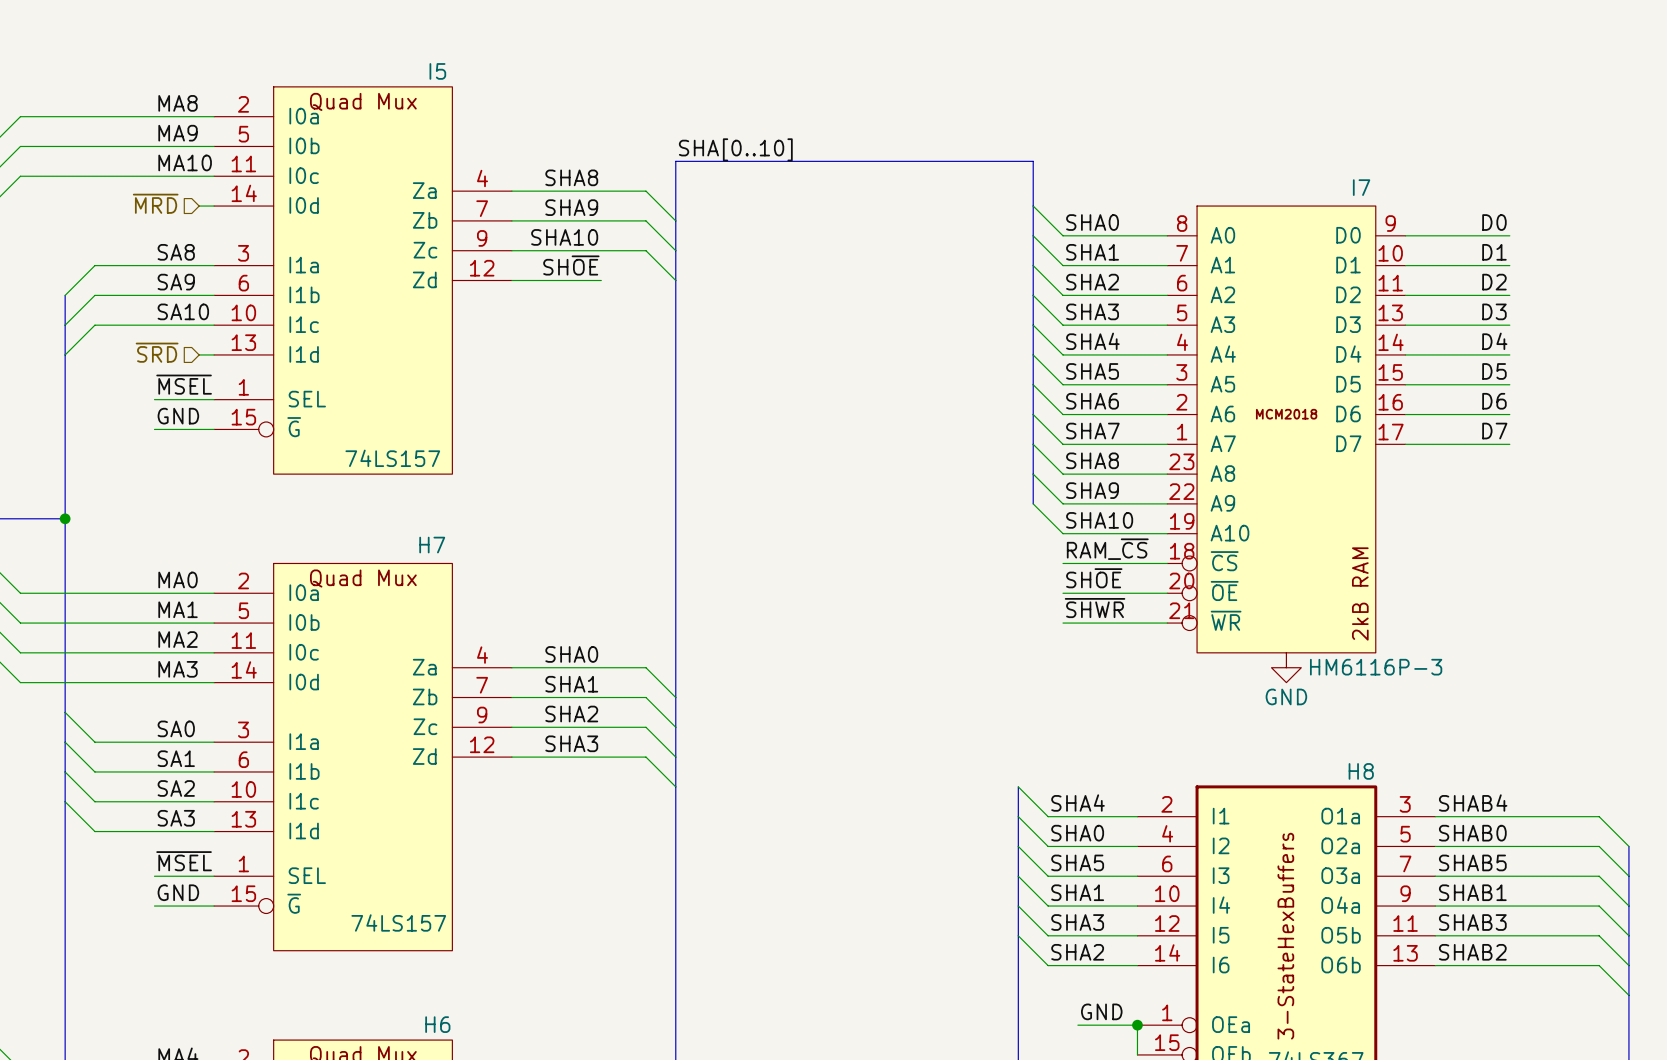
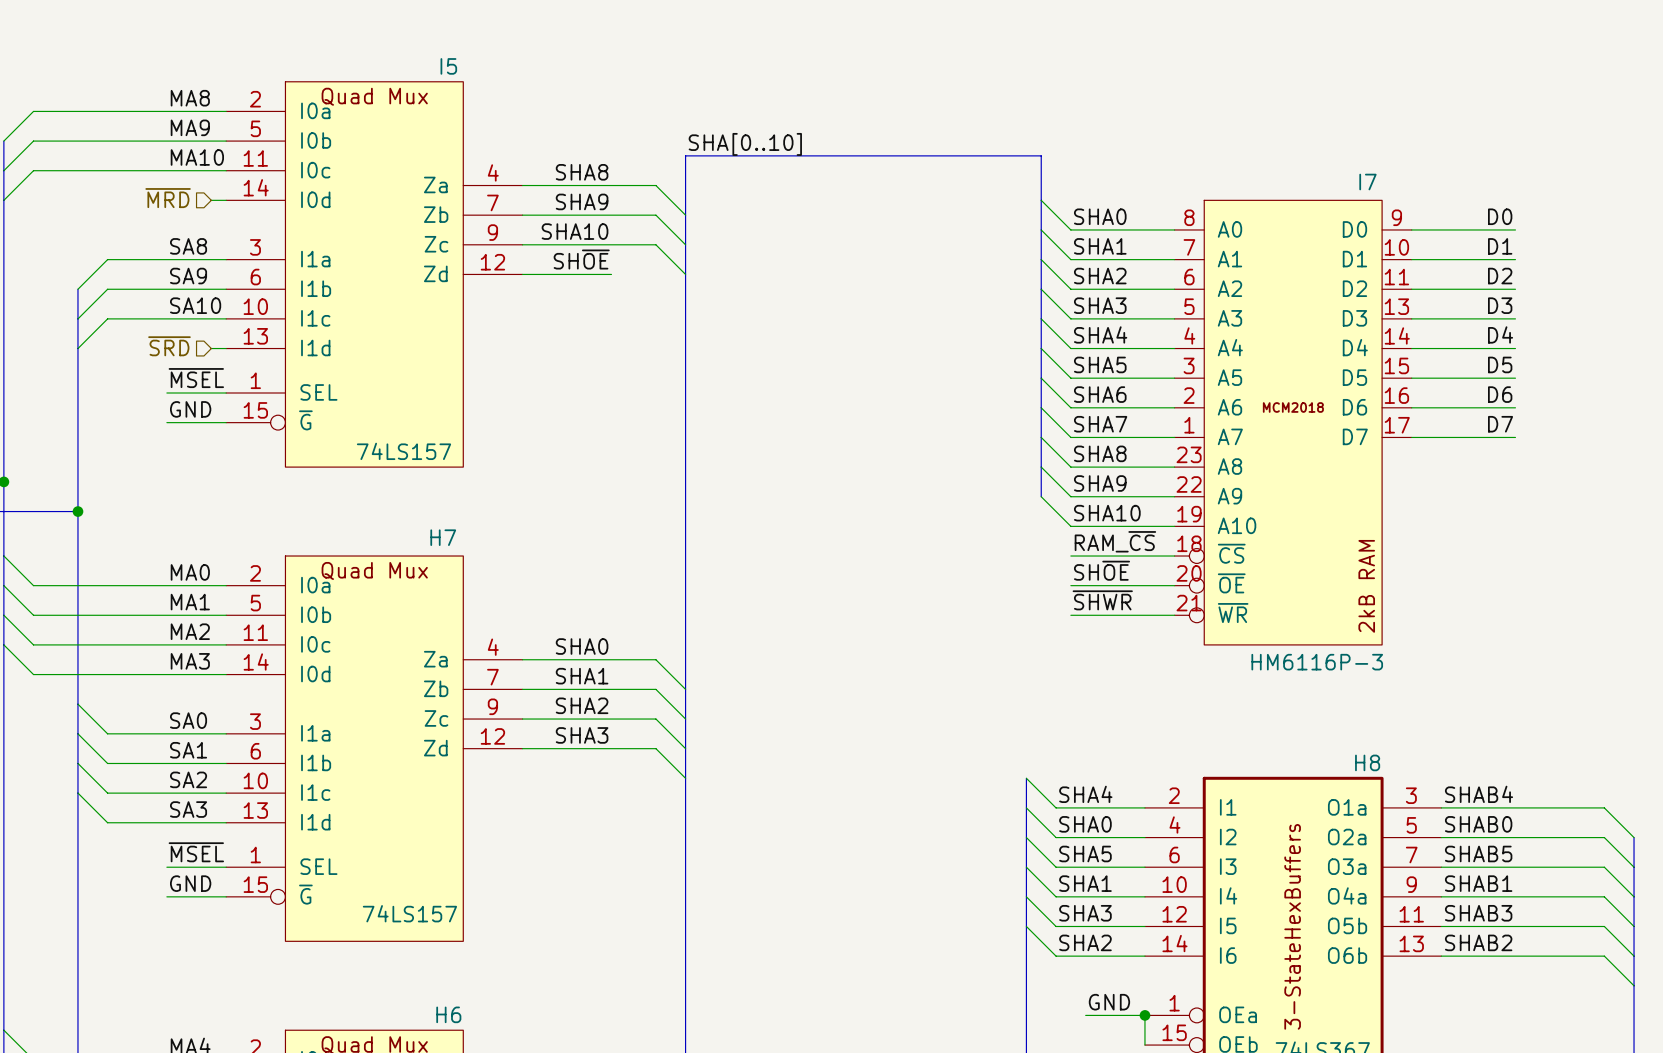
power symbol: GND (1286, 667) -> none
I7 value position: HM6116P-3 (1376, 667) -> HM6116P-3 (1317, 662)

